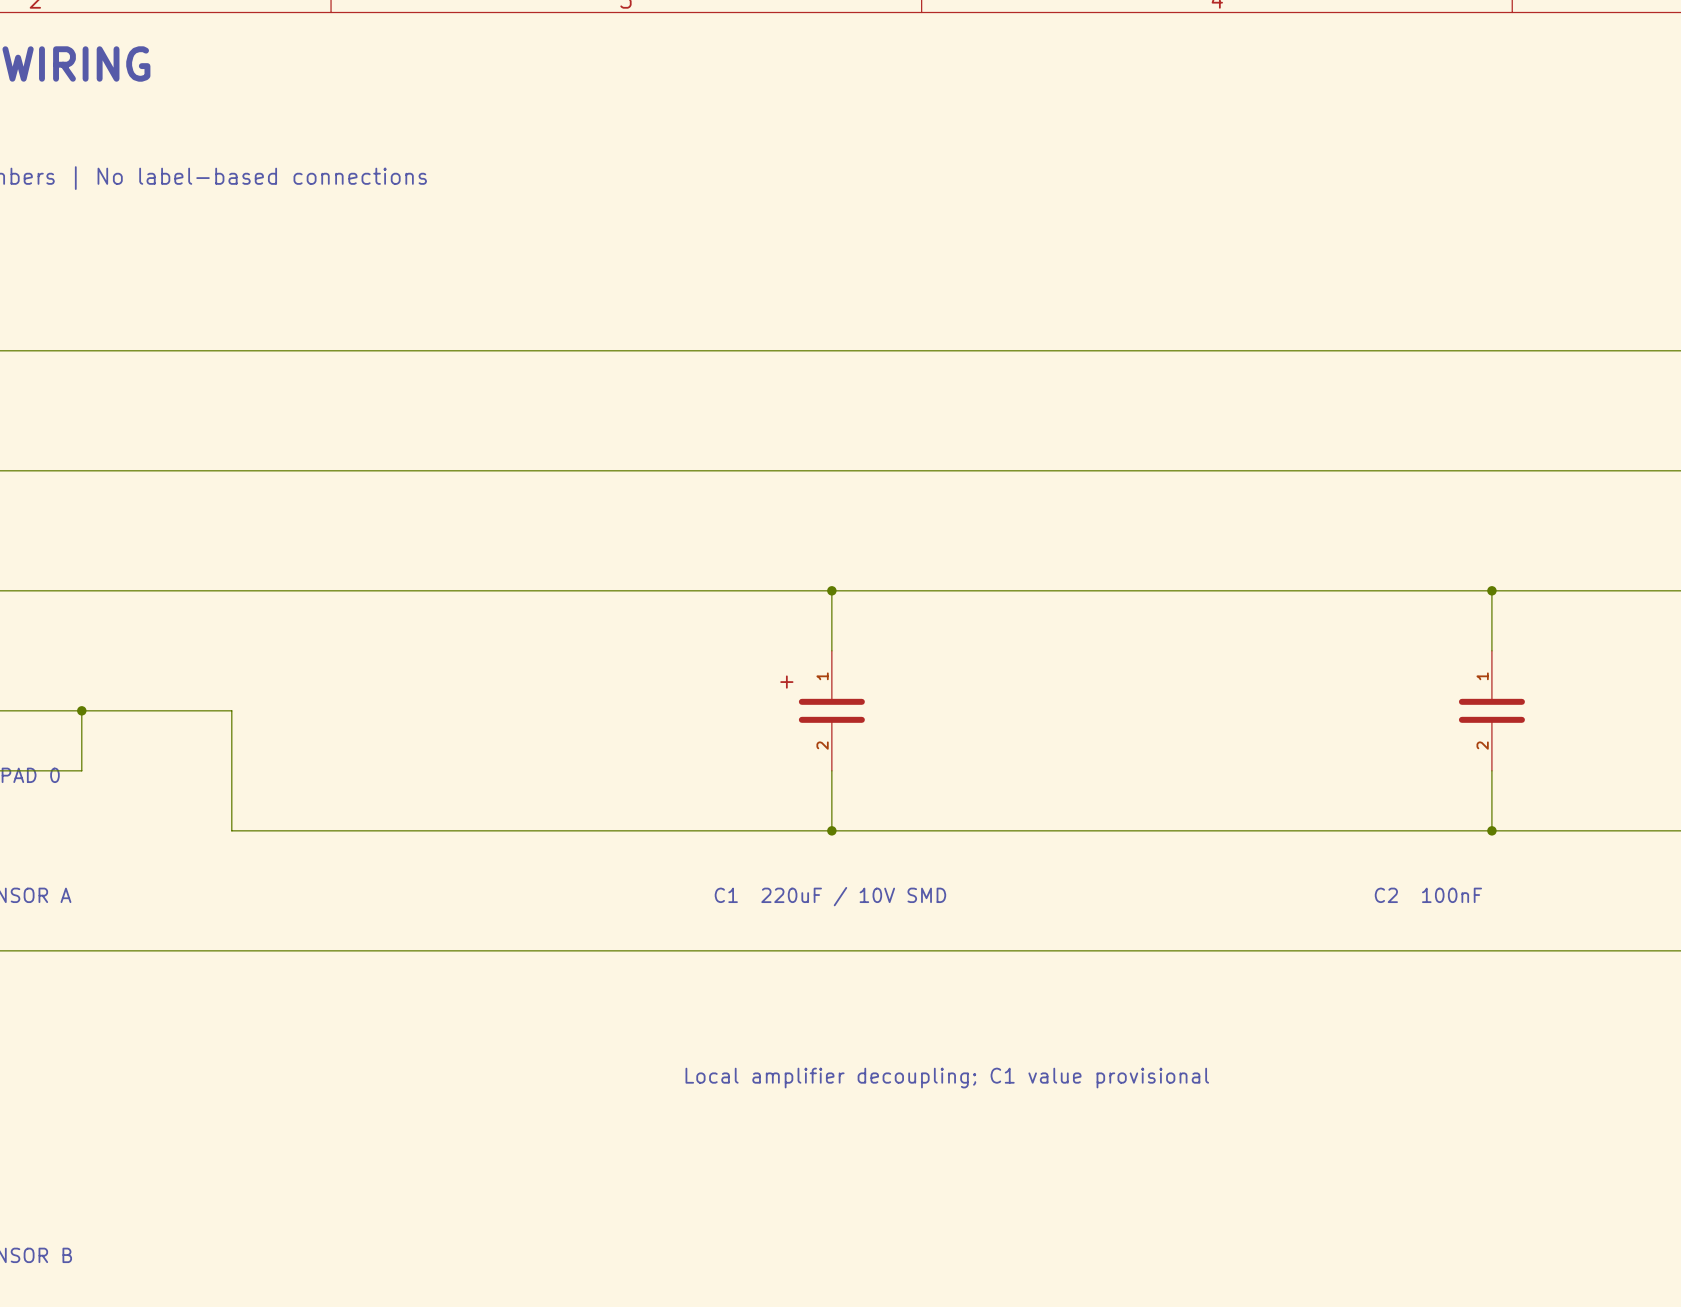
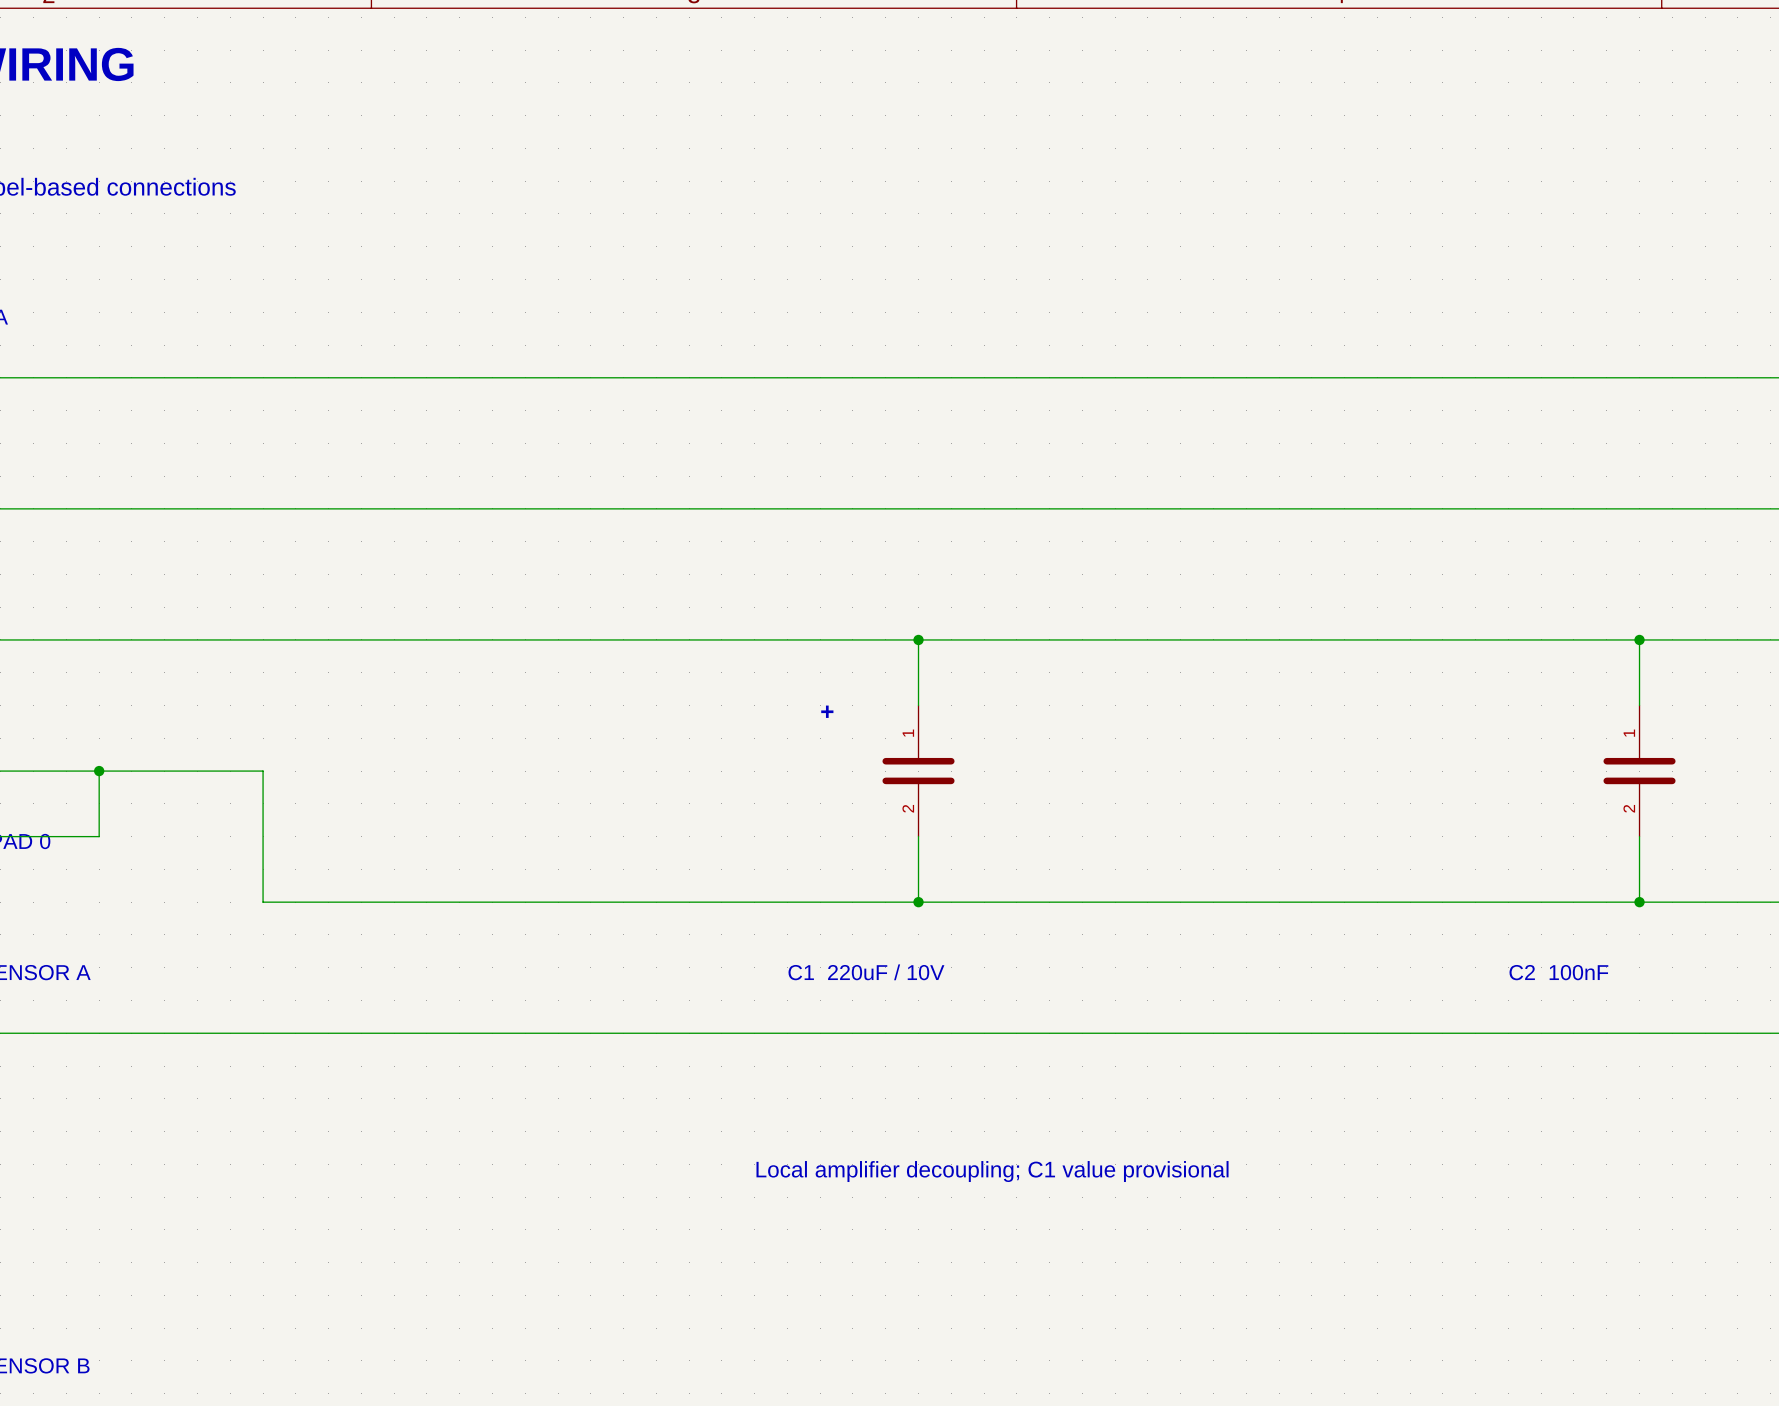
text: none -> + (827, 711)
part text: + (786, 682) -> none
text: C1 220uF / 10V SMD (830, 896) -> C1 220uF / 10V (866, 972)

